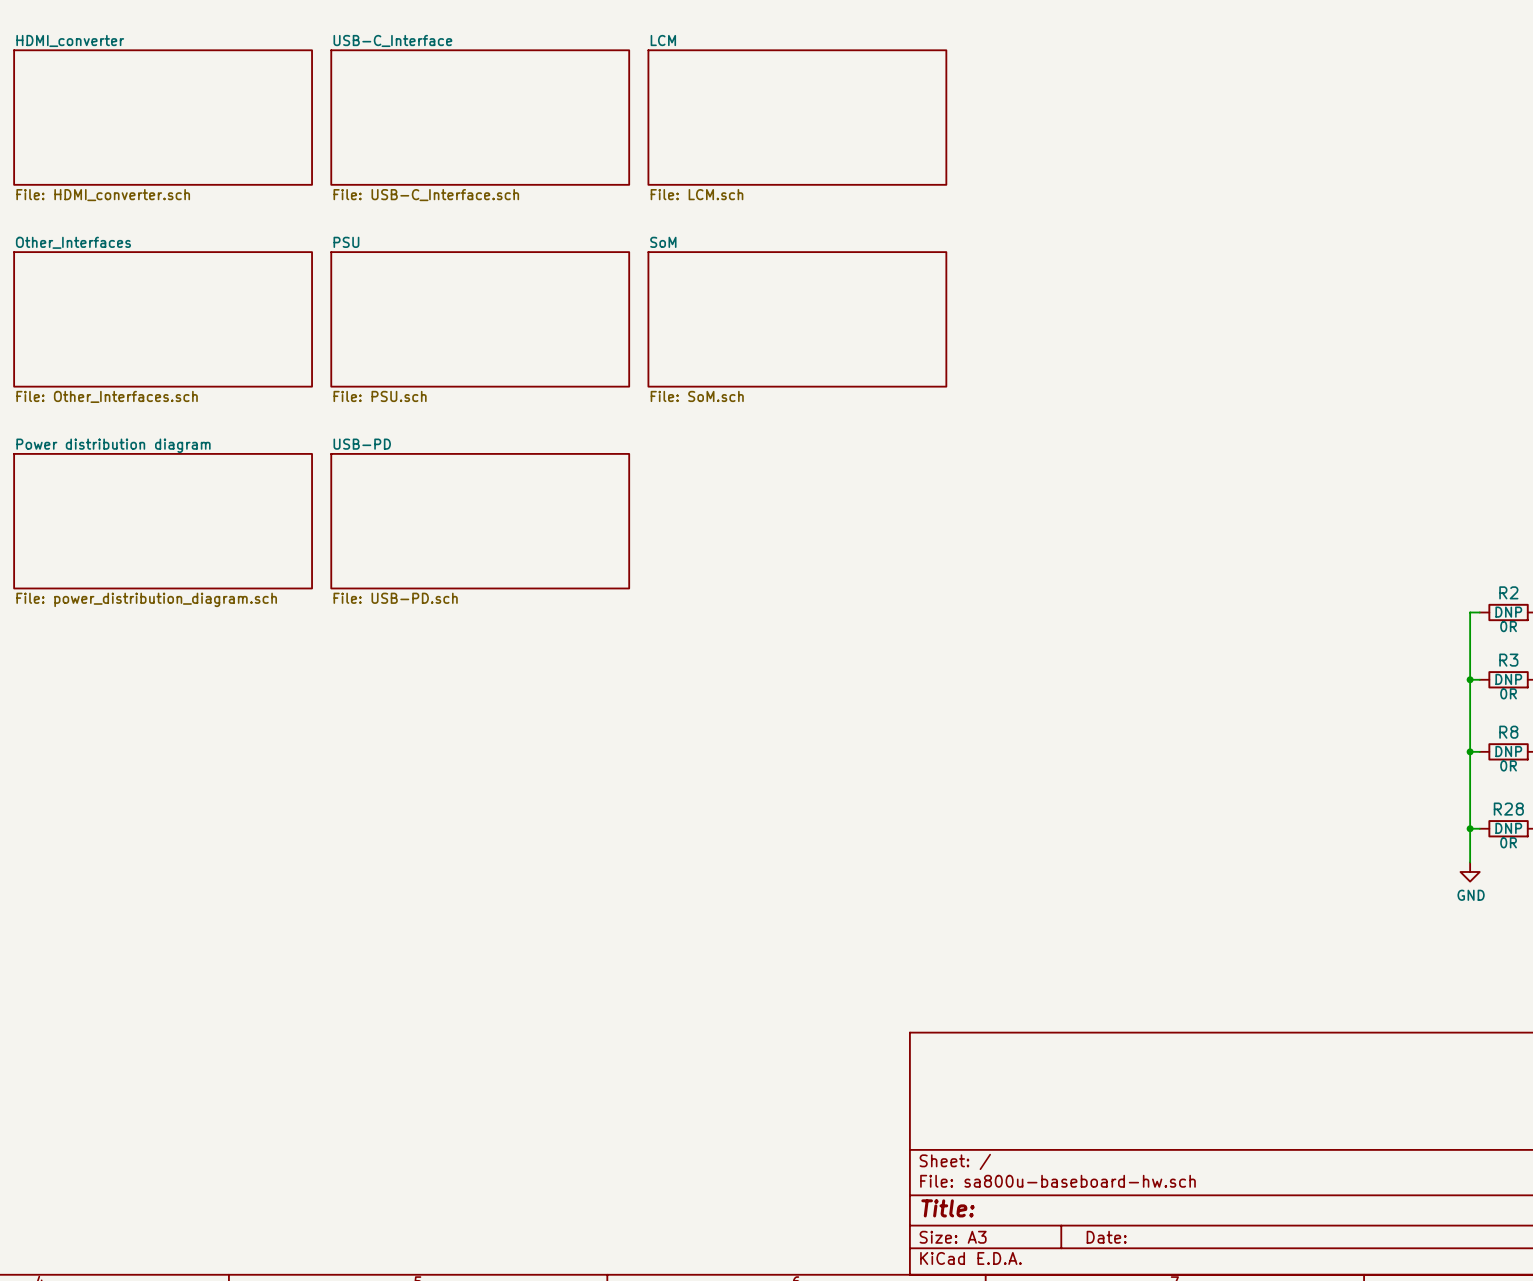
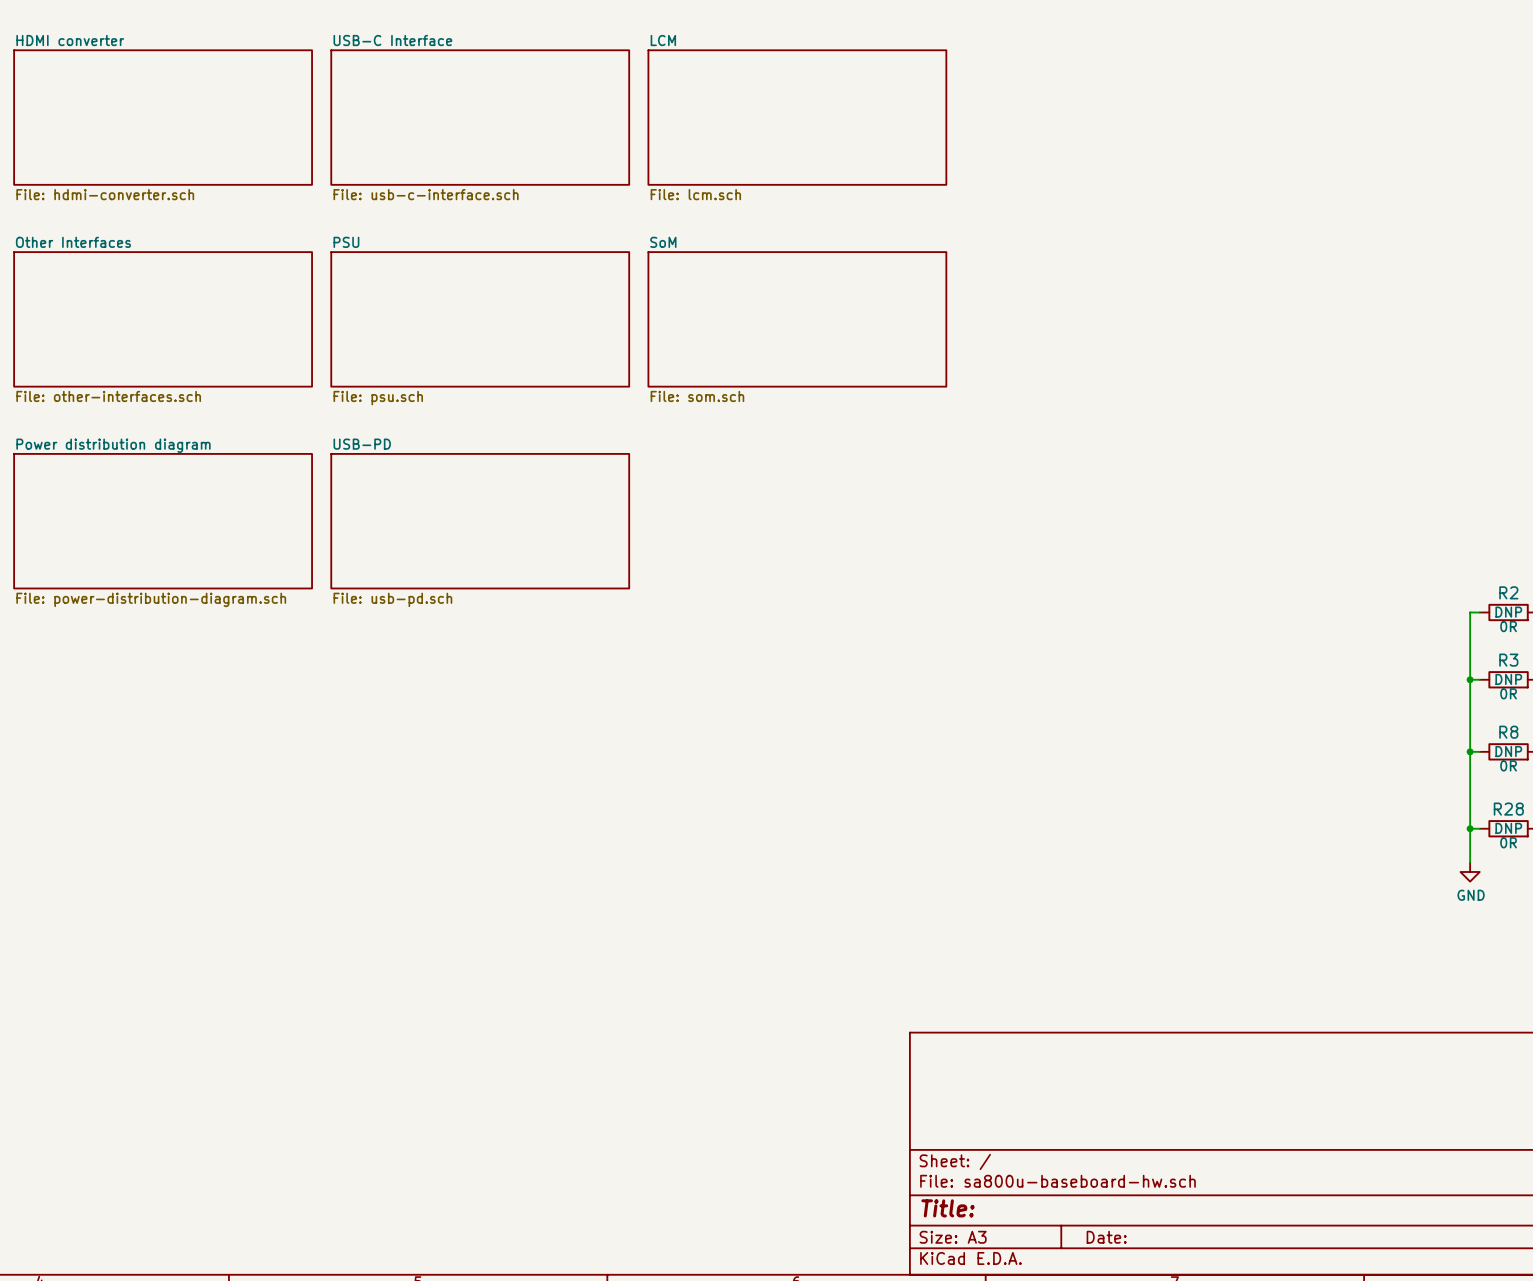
sheet HDMI_converter name: HDMI_converter (70, 40) -> HDMI converter (70, 40)
sheet USB-C_Interface name: USB-C_Interface (392, 40) -> USB-C Interface (392, 40)
sheet LCM value: File: LCM.sch (696, 194) -> File: lcm.sch (695, 194)
sheet HDMI_converter value: File: HDMI_converter.sch (103, 195) -> File: hdmi-converter.sch (105, 194)
sheet USB-C_Interface value: File: USB-C_Interface.sch (426, 195) -> File: usb-c-interface.sch (426, 194)
sheet Other_Interfaces name: Other_Interfaces (73, 242) -> Other Interfaces (73, 242)
sheet Other_Interfaces value: File: Other_Interfaces.sch (107, 396) -> File: other-interfaces.sch (108, 396)
sheet PSU value: File: PSU.sch (380, 396) -> File: psu.sch (378, 398)
sheet SoM value: File: SoM.sch (697, 396) -> File: som.sch (697, 396)
sheet USB-PD value: File: USB-PD.sch (395, 598) -> File: usb-pd.sch (392, 599)
sheet Power distribution diagram value: File: power_distribution_diagram.sch (146, 599) -> File: power-distribution-diagram.sch (151, 599)

